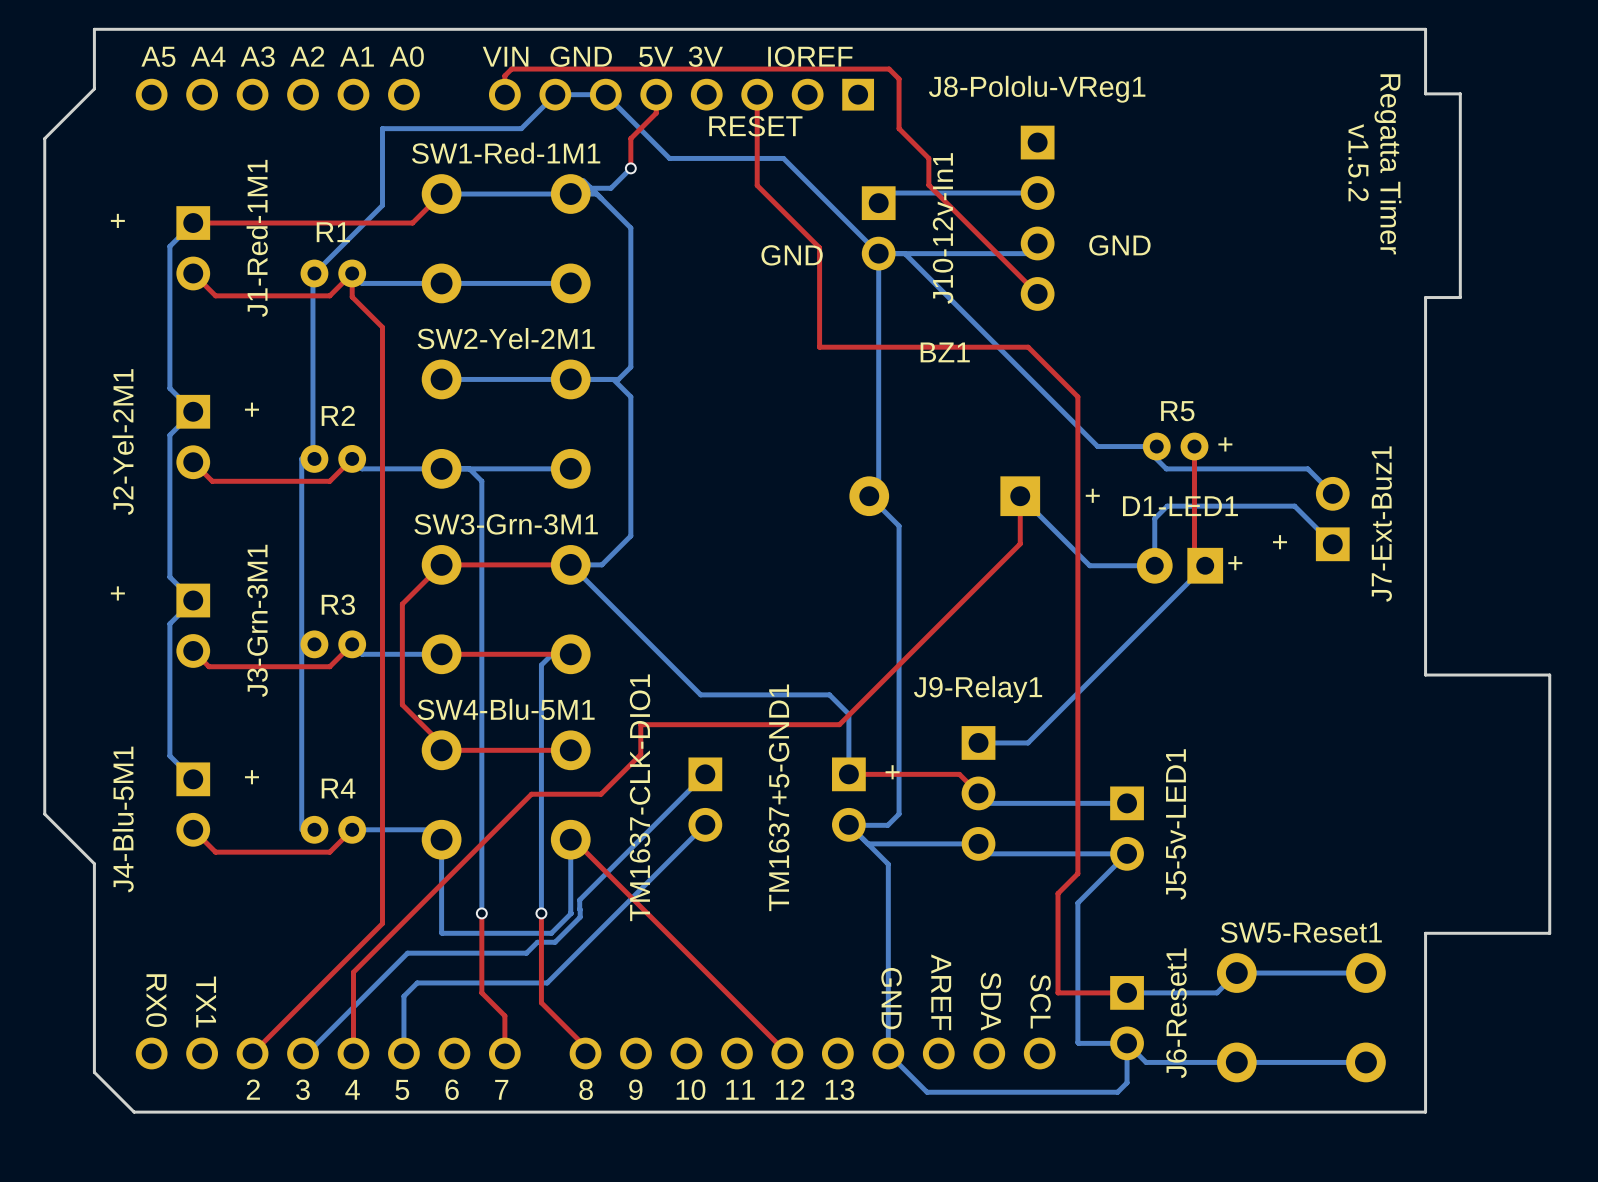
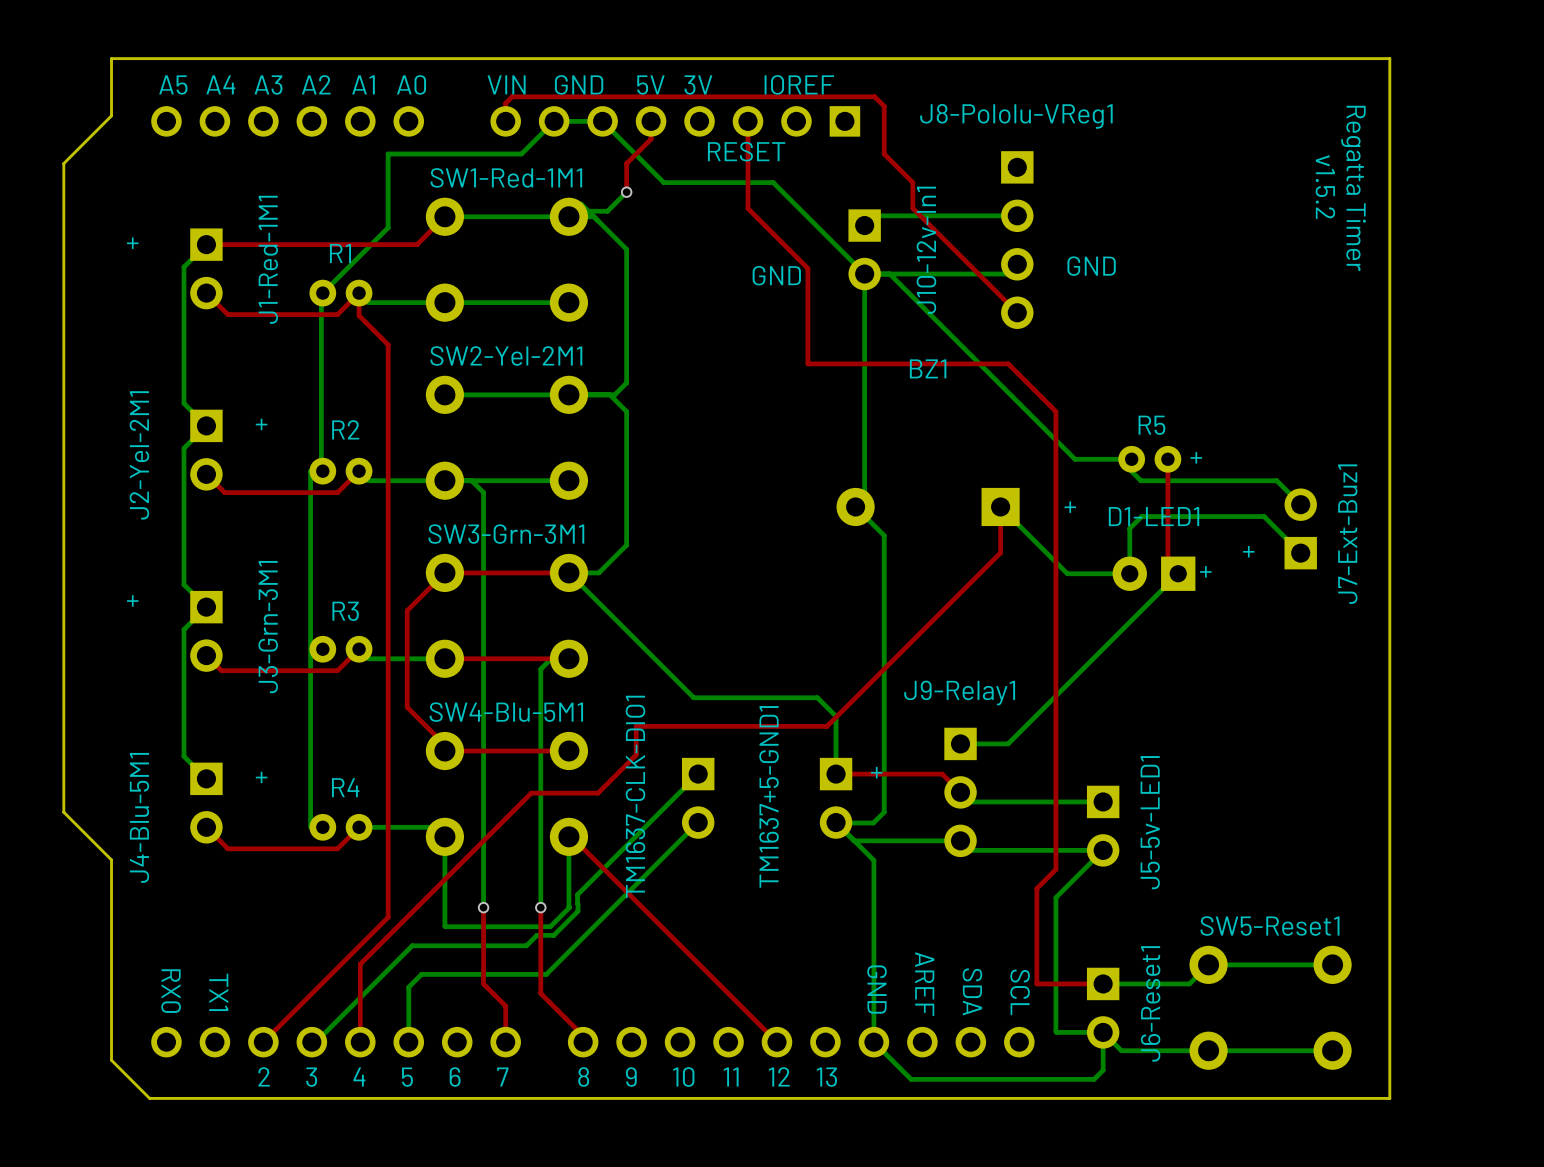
board edge: (1425, 93) (1460, 93) (1460, 297) (1425, 297) -> (1389, 120) (1389, 316)
board edge: (1425, 675) (1549, 675) (1549, 933) (1425, 933) -> (1389, 678) (1389, 926)

